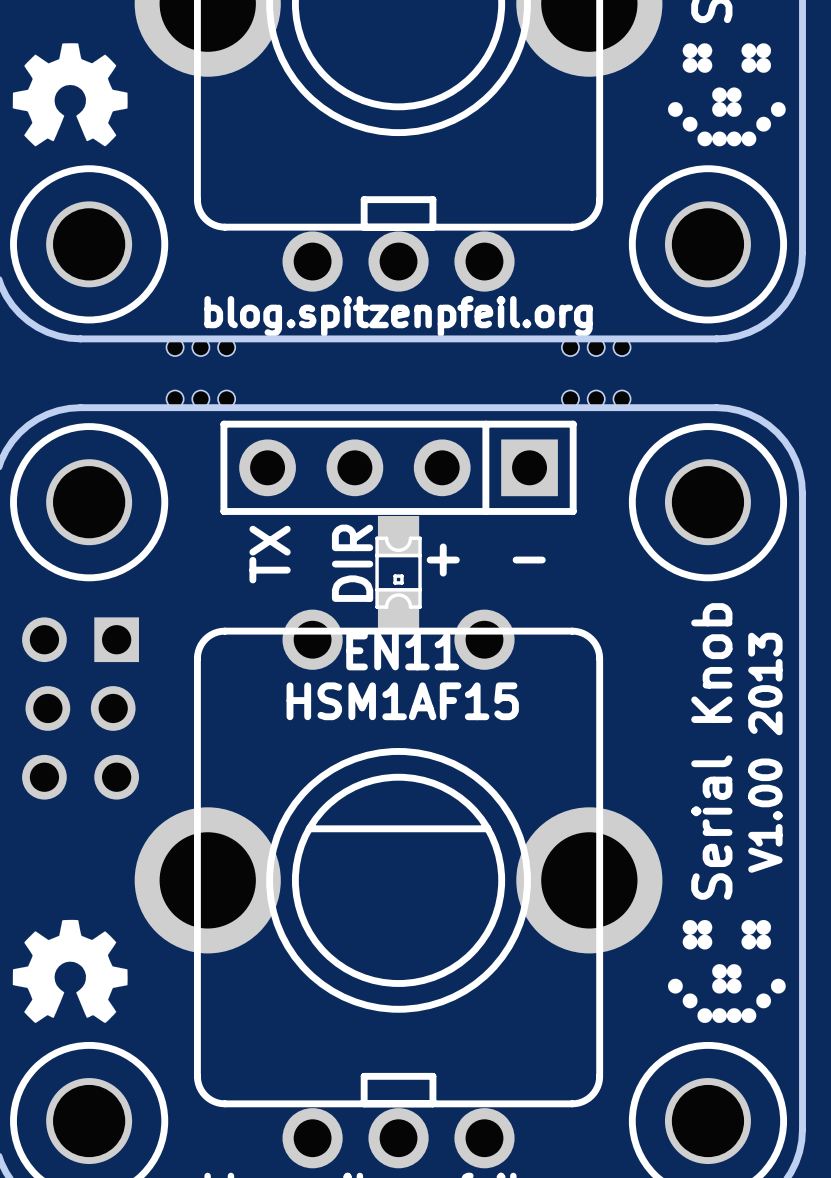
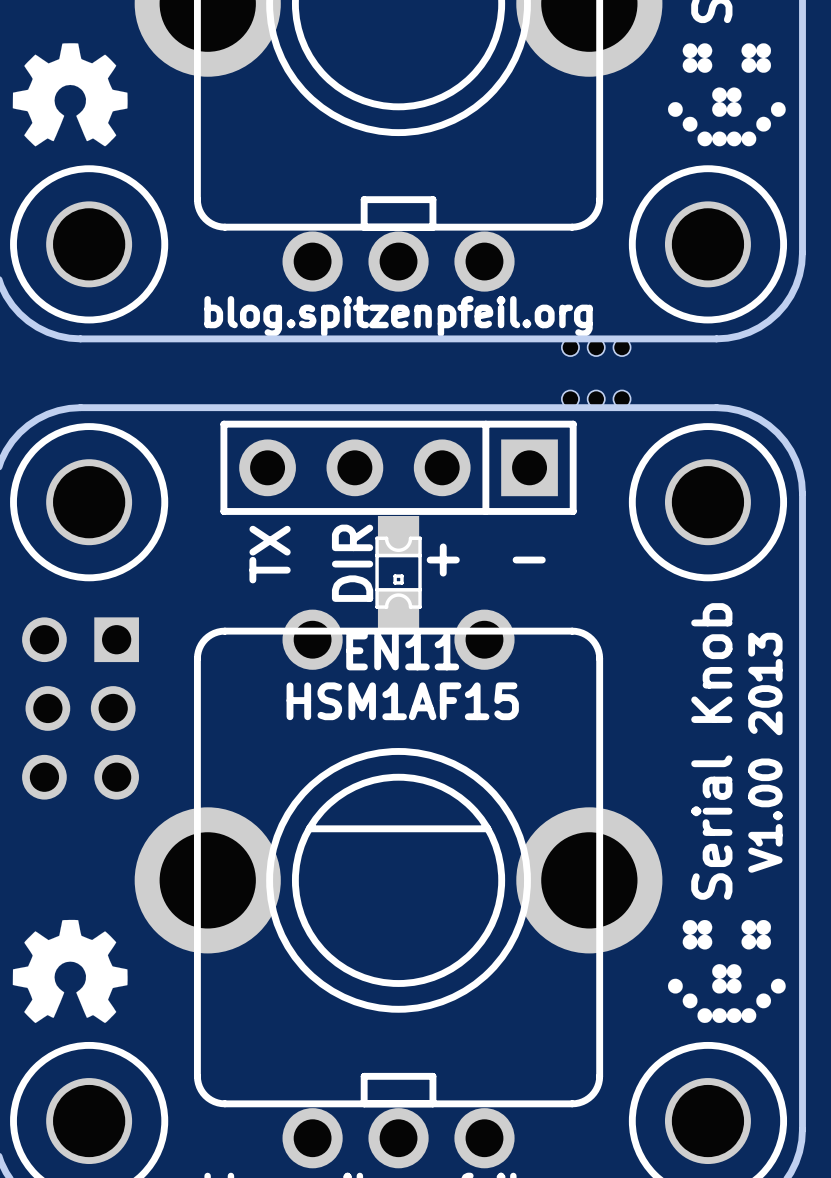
part: (175, 347) -> none
part: (200, 347) -> none
part: (226, 347) -> none
part: (175, 399) -> none
part: (200, 399) -> none
part: (226, 399) -> none

